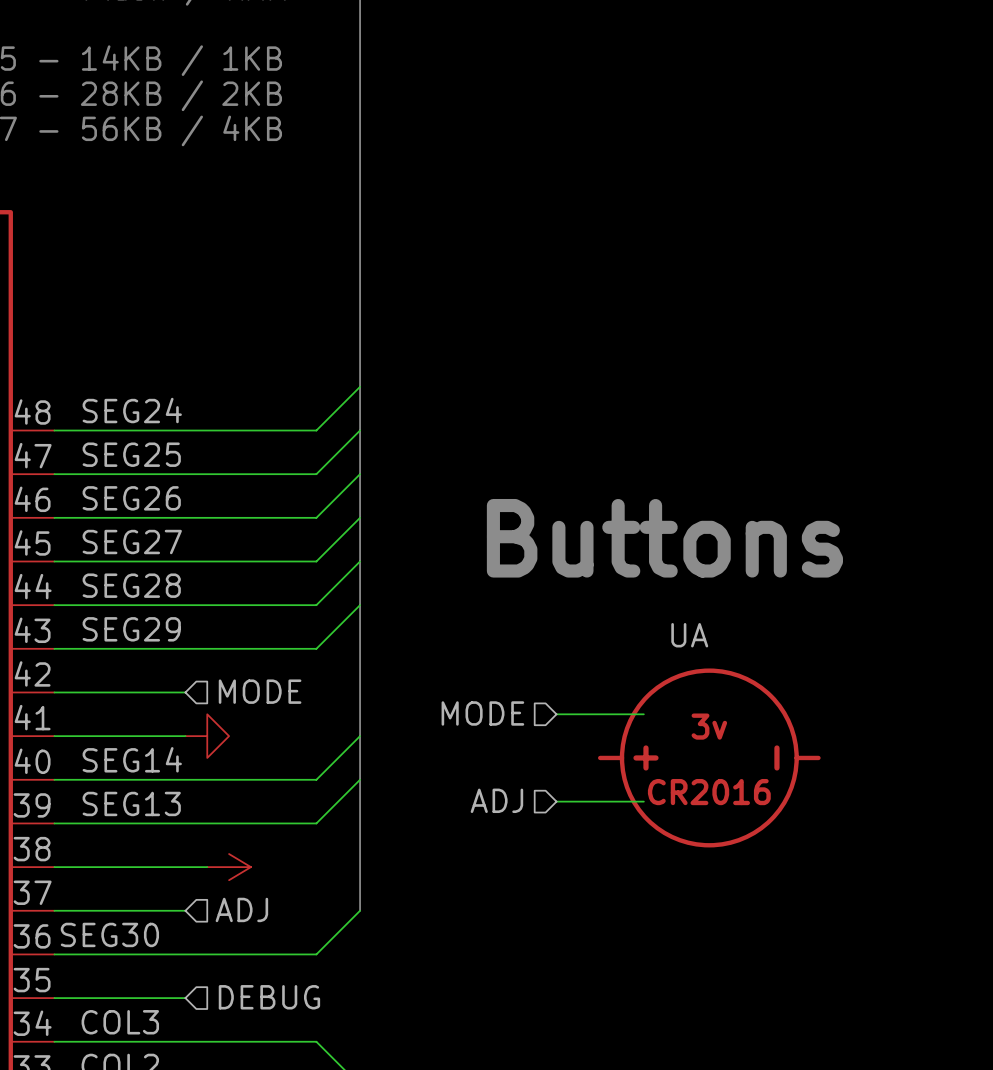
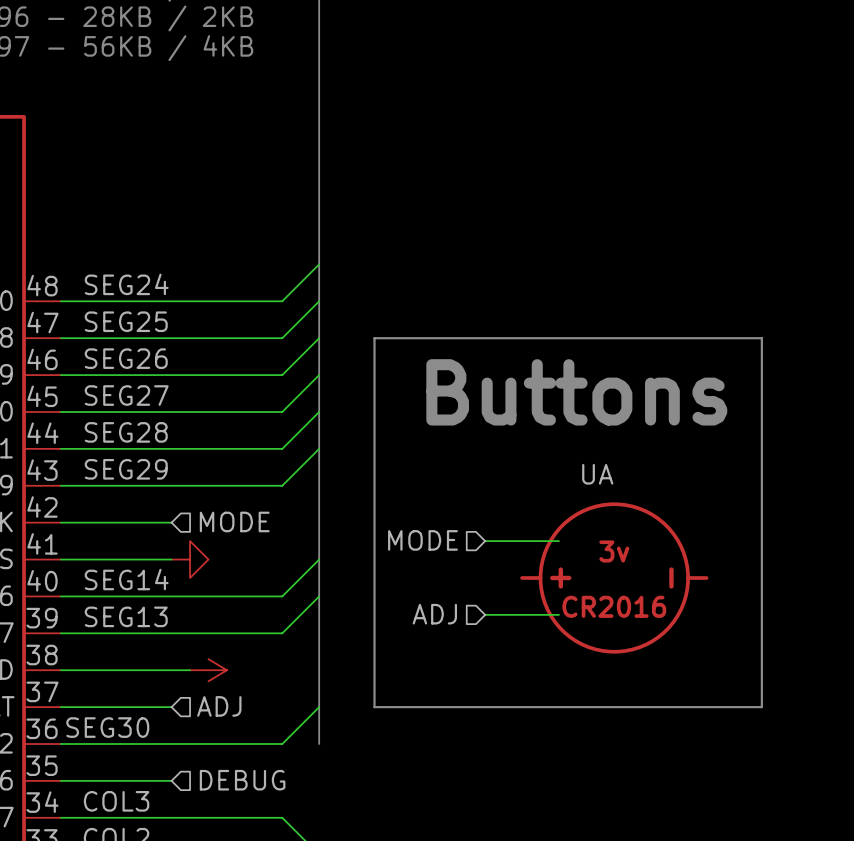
line: none -> (374, 338) (761, 338) (761, 707) (374, 707) (374, 338)
bus: none -> (319, 707) (319, 744)

